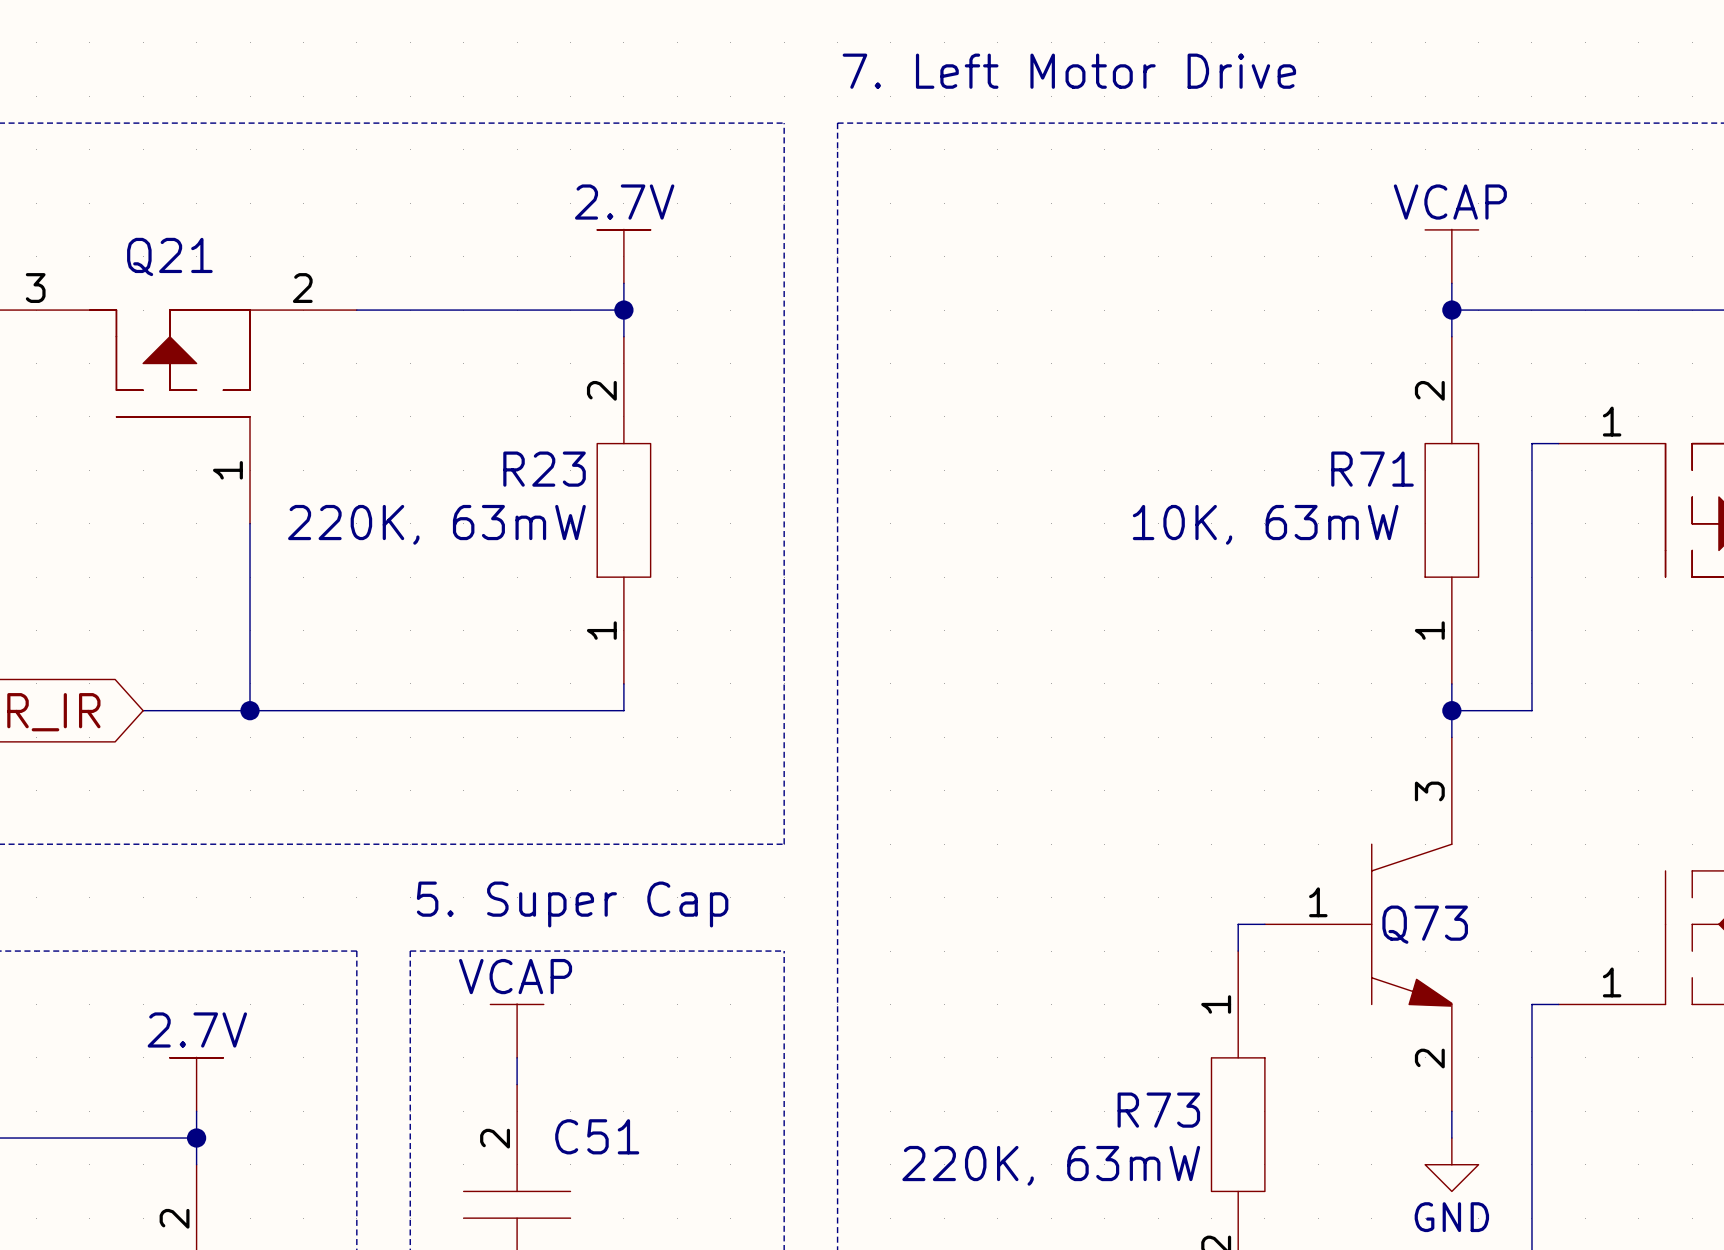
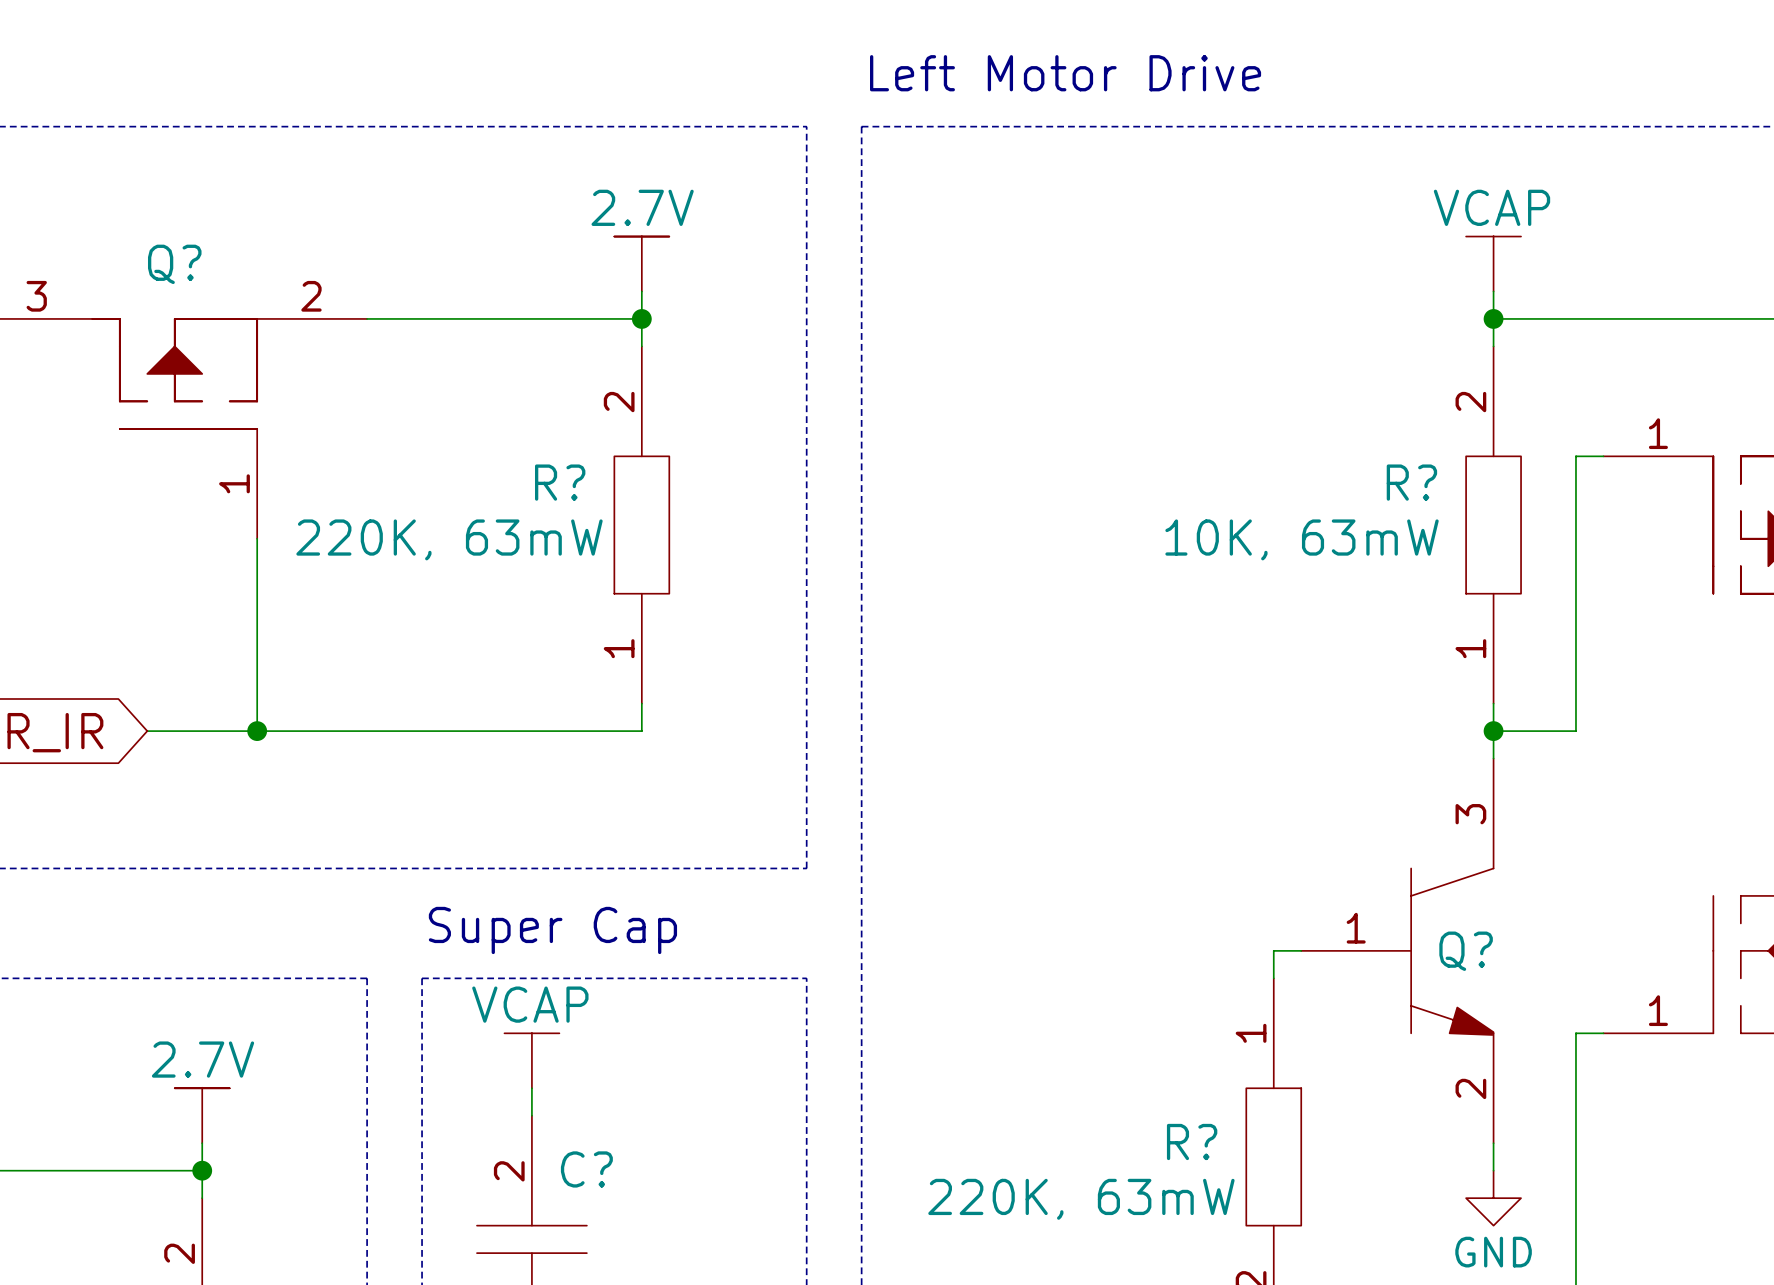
text: 7. Left Motor Drive (1069, 71) -> Left Motor Drive (1065, 73)
Q21 name: Q21 (169, 256) -> Q? (174, 264)
R23 name: R23 (544, 469) -> R? (560, 482)
R71 name: R71 (1372, 469) -> R? (1411, 482)
text: 5. Super Cap (572, 904) -> Super Cap (552, 930)
Q73 name: Q73 (1425, 924) -> Q? (1466, 951)
R73 name: R73 (1158, 1110) -> R? (1192, 1141)
C51 name: C51 (597, 1136) -> C? (586, 1169)

